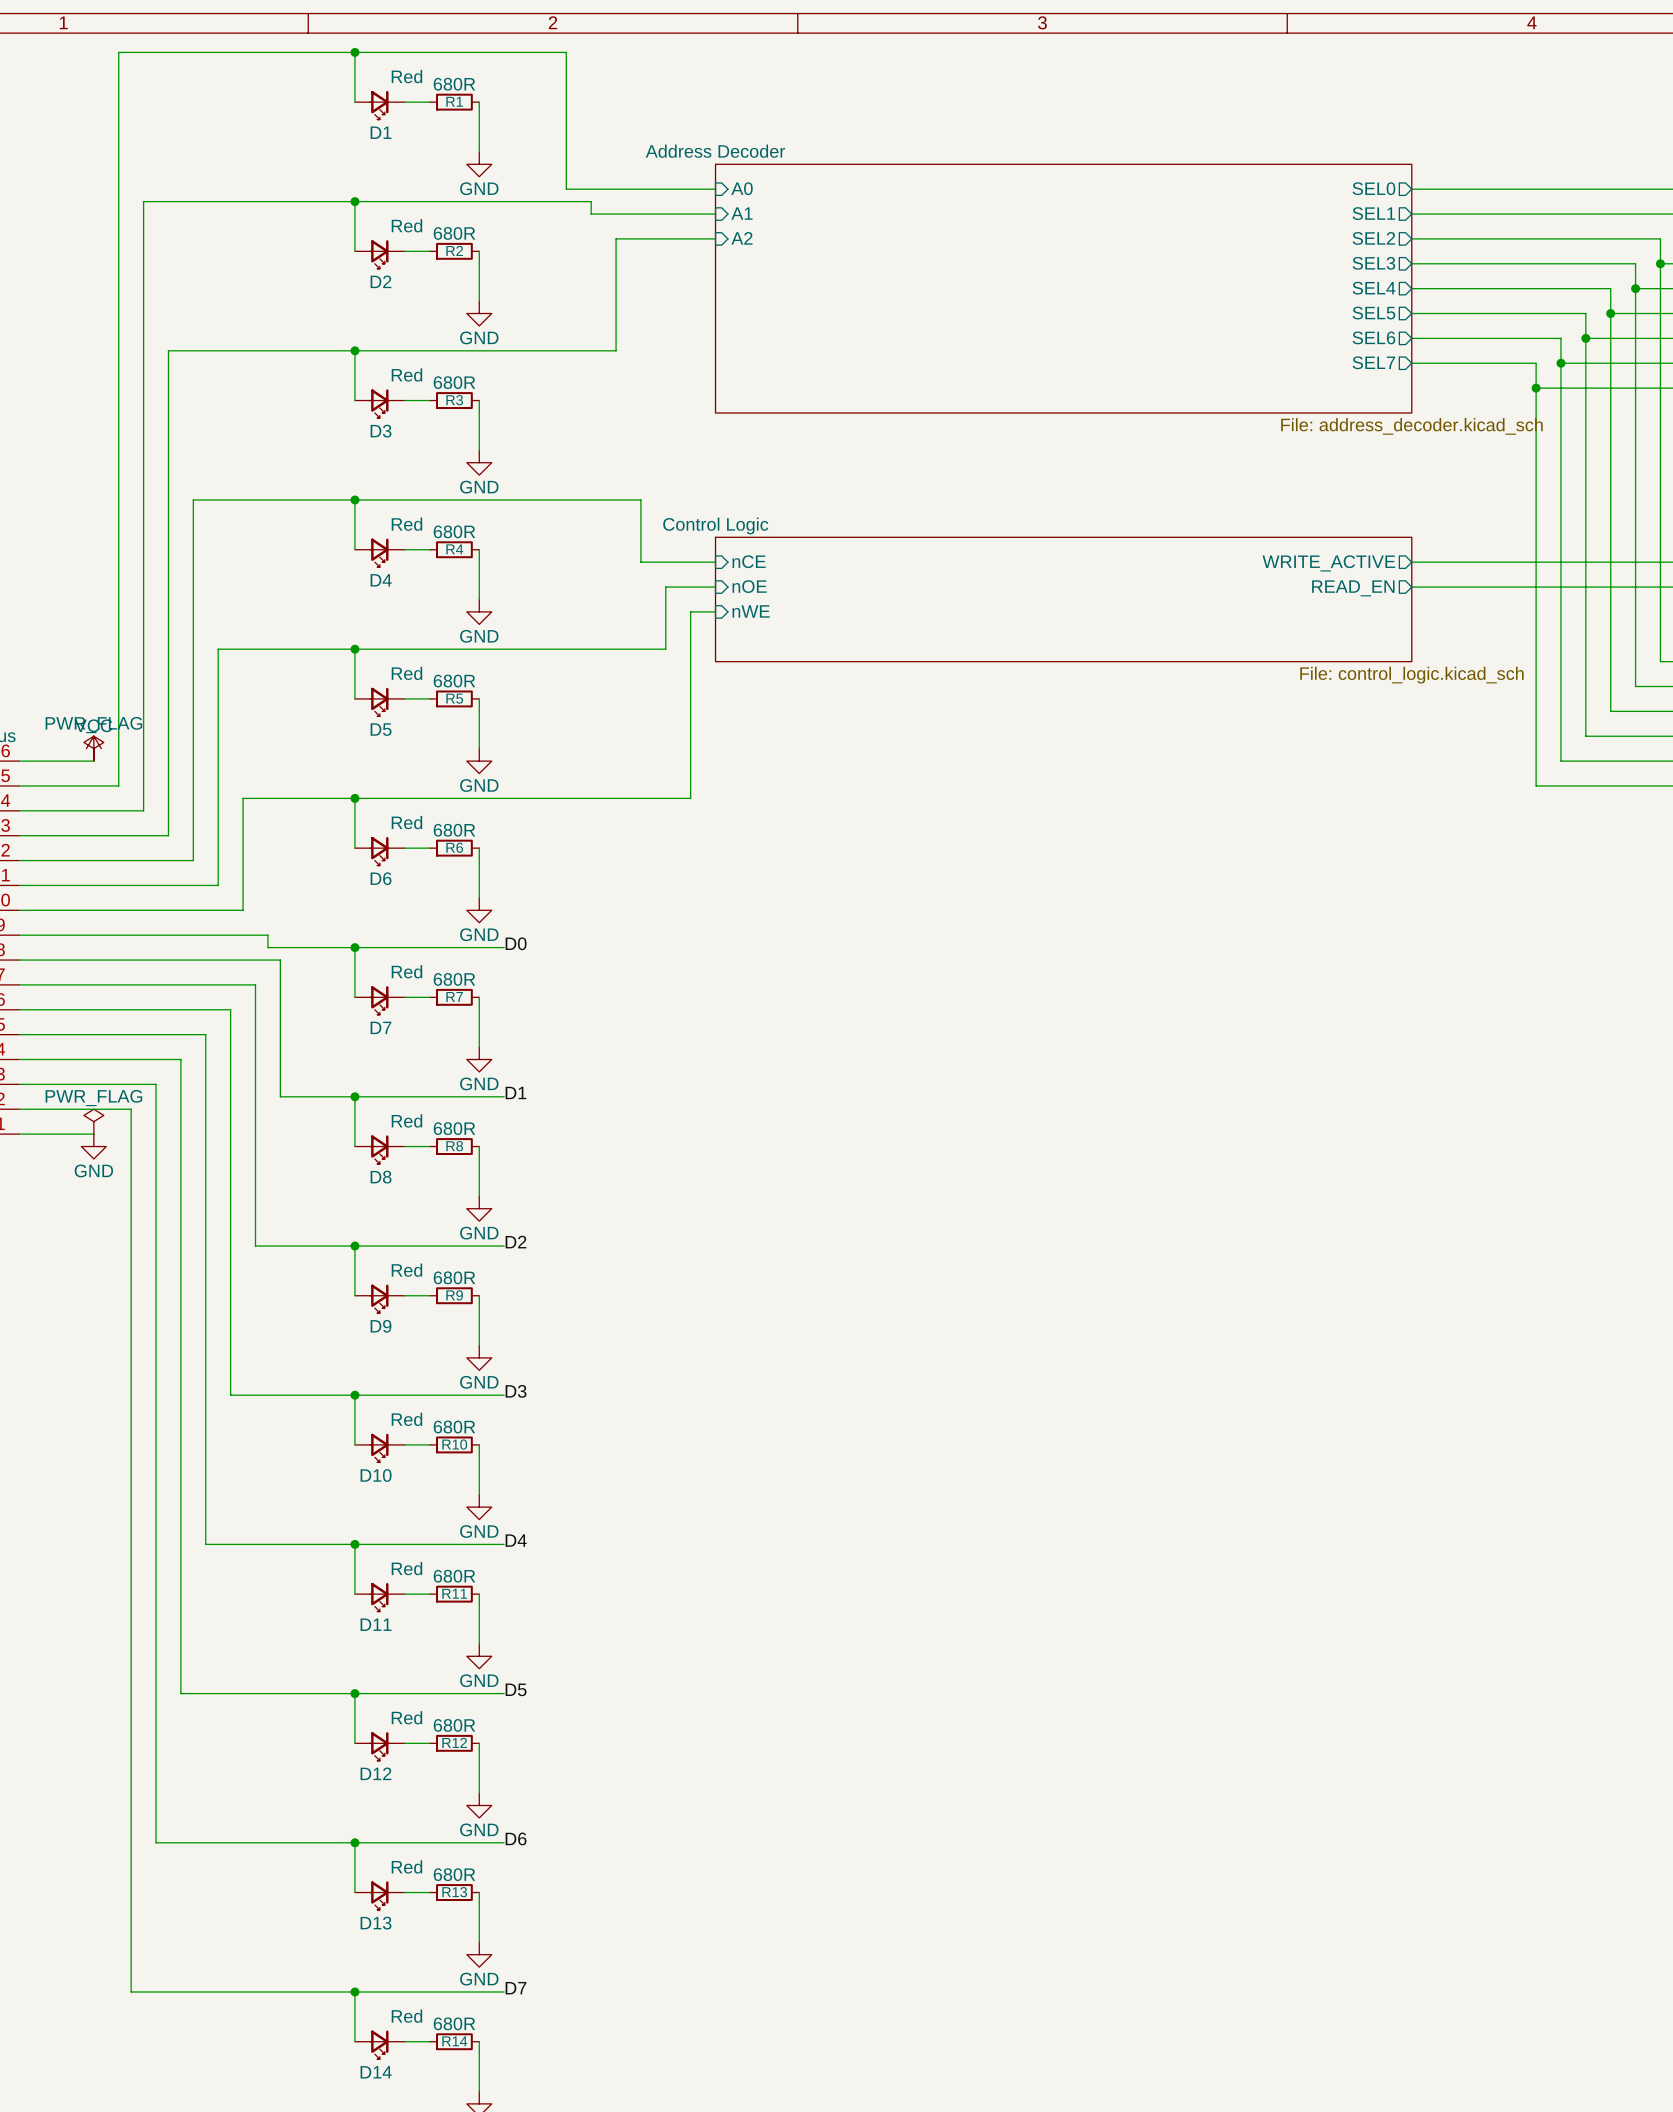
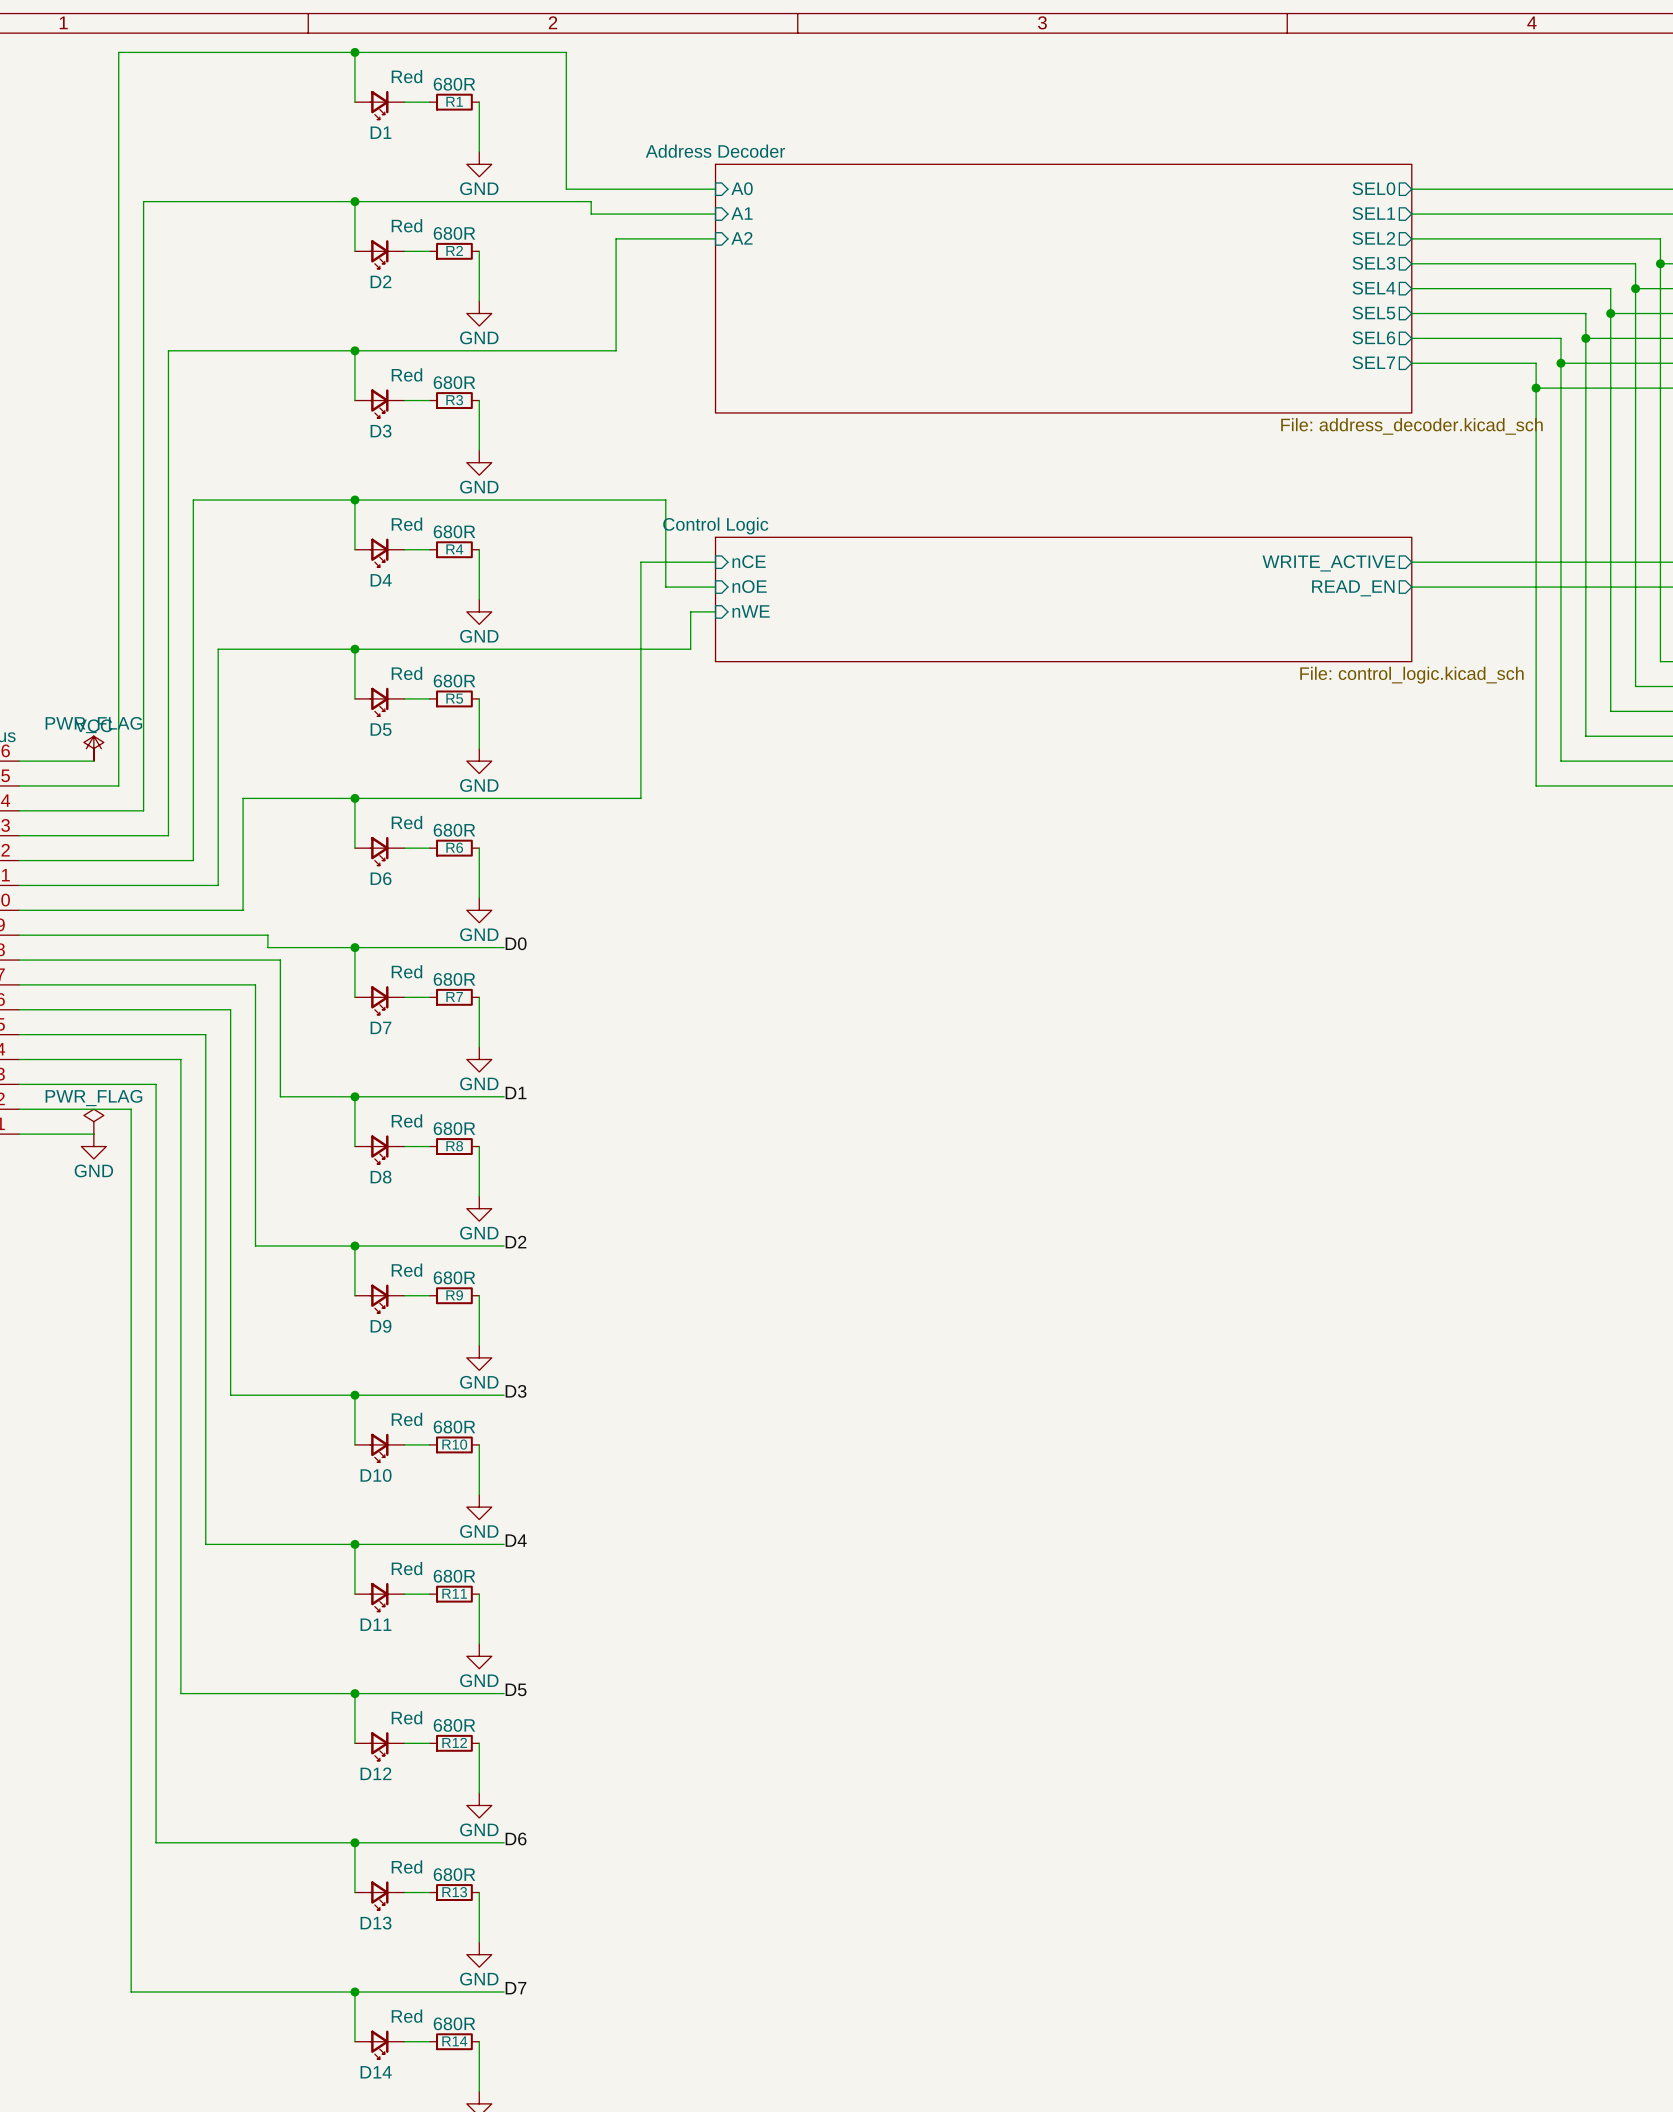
wire: (640, 500) (640, 562) -> (640, 500) (665, 500) (665, 587)
wire: (665, 587) (665, 649) -> (690, 649) (665, 649)
wire: (690, 649) (690, 798) (640, 798) -> (640, 562) (640, 798)

